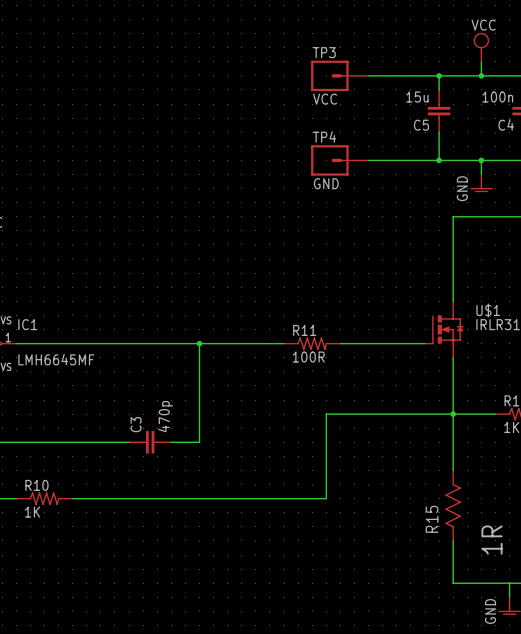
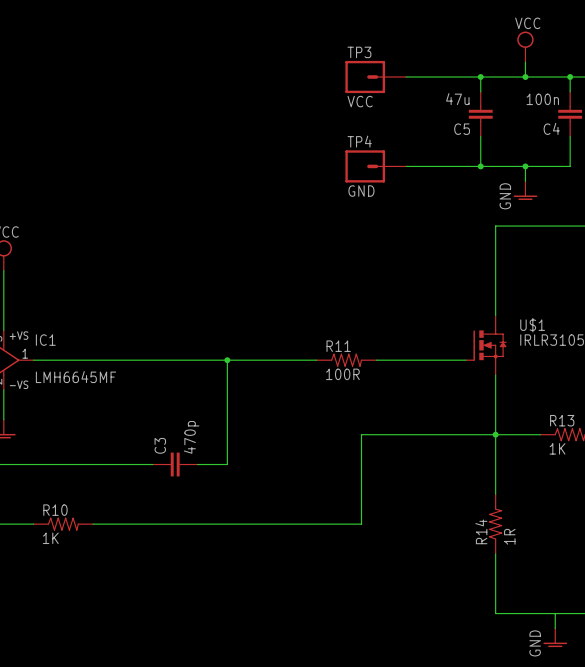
C5 value: 15u (417, 97) -> 47u (457, 99)
R14: none -> 1R (495, 524)
R15: 1R (453, 505) -> none

